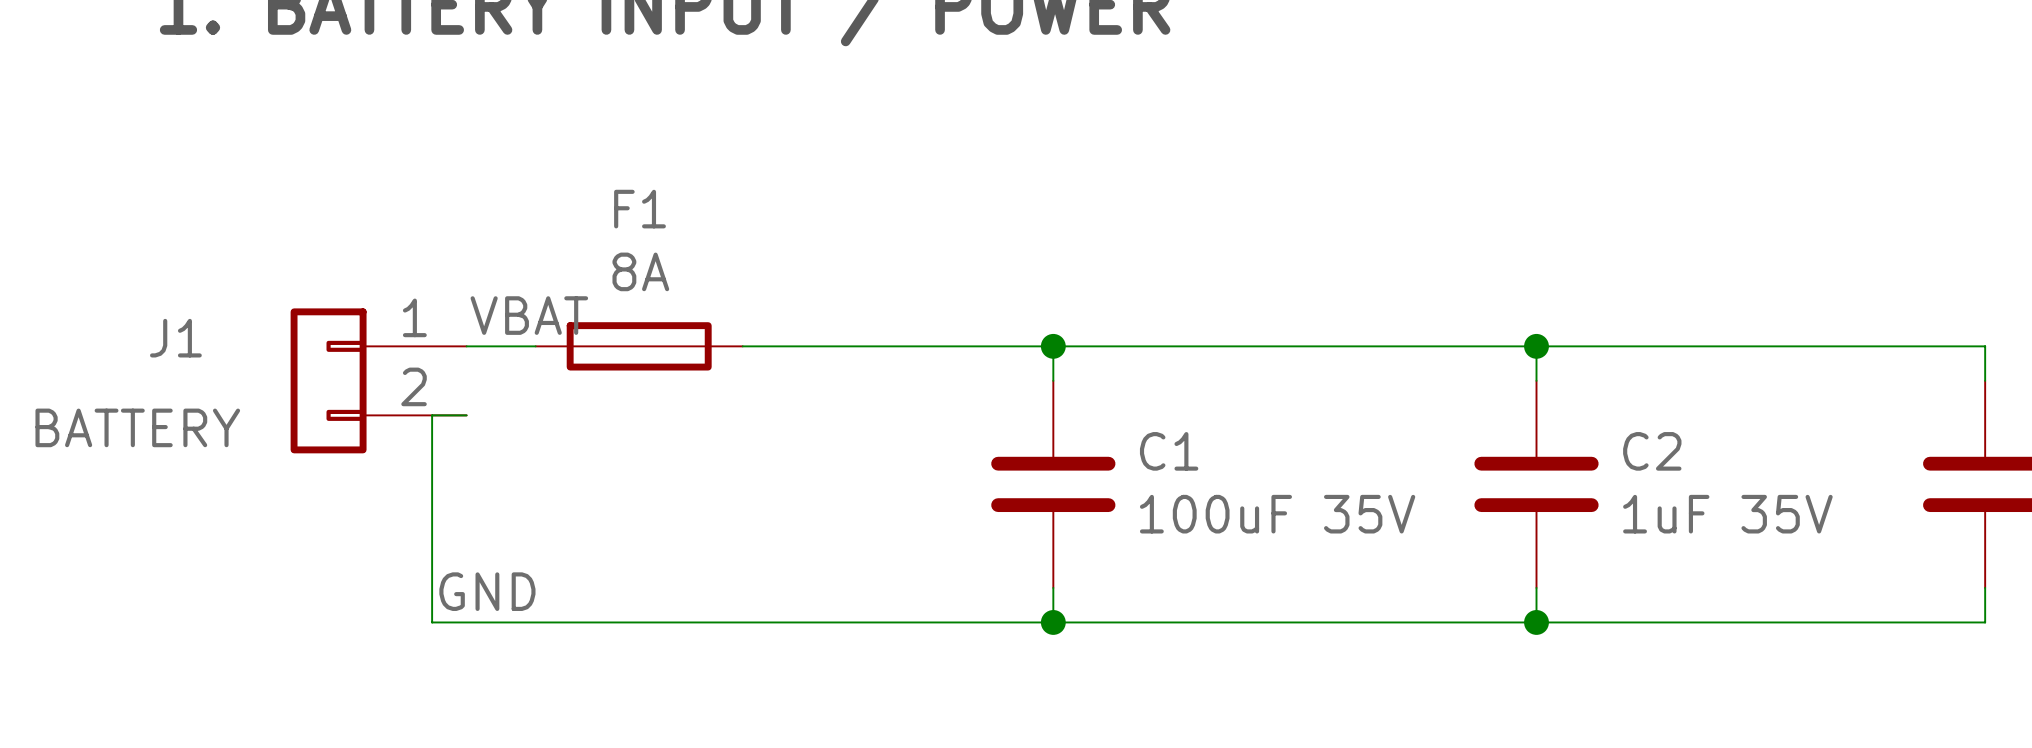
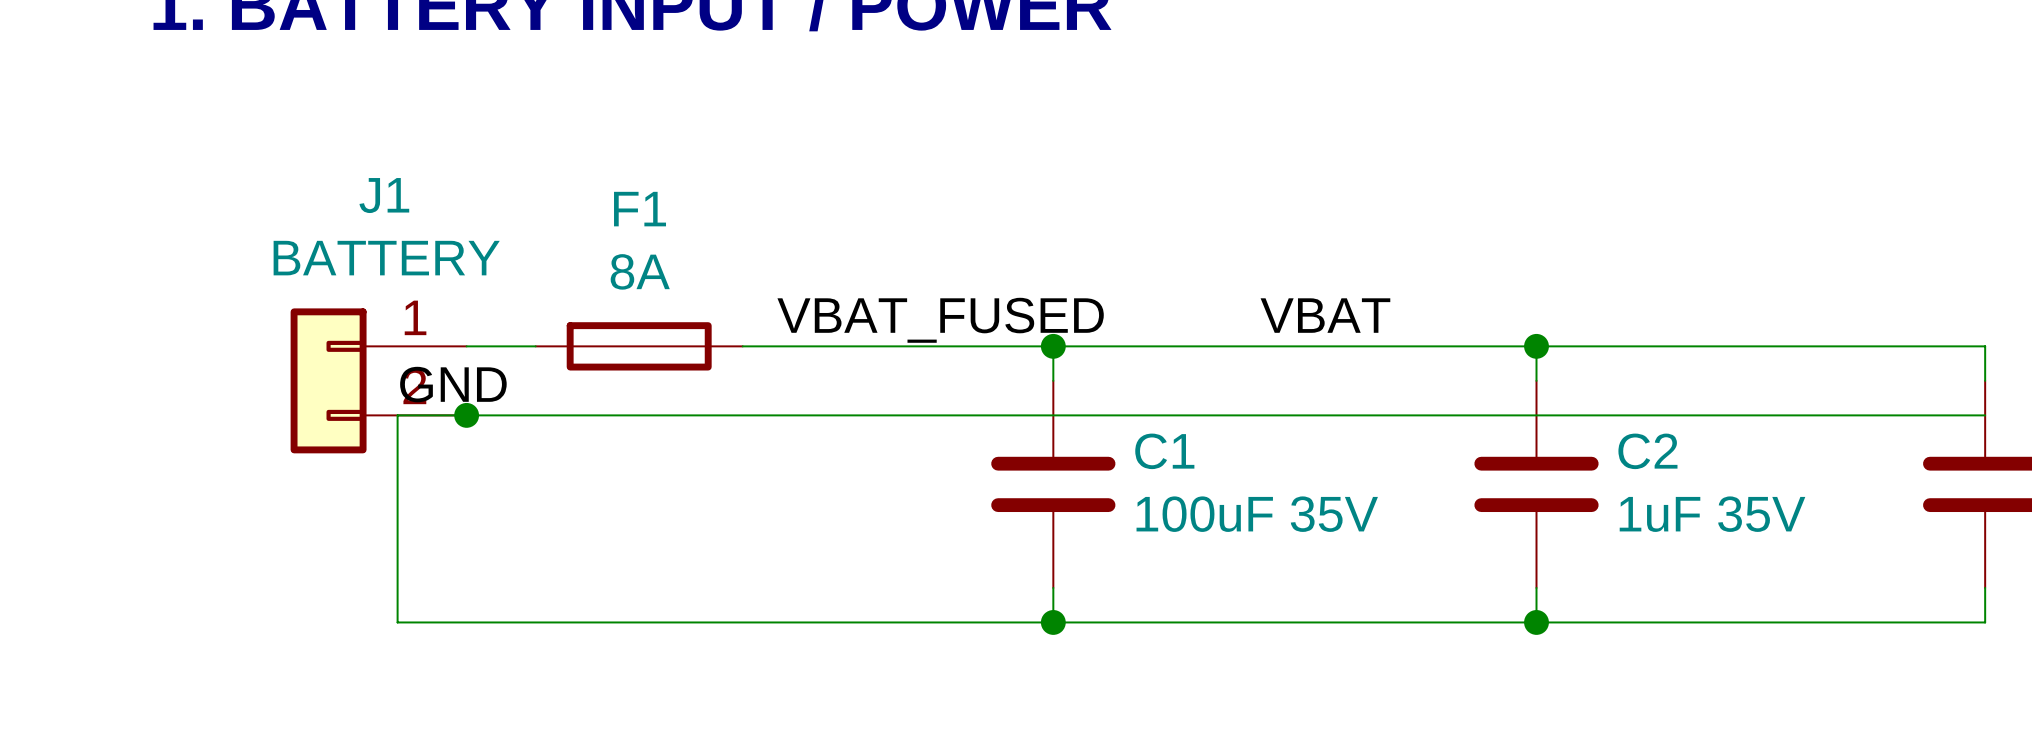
label: VBAT (529, 315) -> none
label: none -> VBAT (1325, 315)
label: none -> VBAT_FUSED (940, 320)
J1 name position: J1 (175, 338) -> J1 (384, 195)
wire: (432, 415) (432, 622) -> (432, 415) (397, 415) (397, 622) (432, 622)
wire: none -> (466, 415) (1985, 415)
junction: none -> (466, 415)
J1 value position: BATTERY (137, 427) -> BATTERY (386, 258)
label position: GND (487, 591) -> GND (453, 384)

